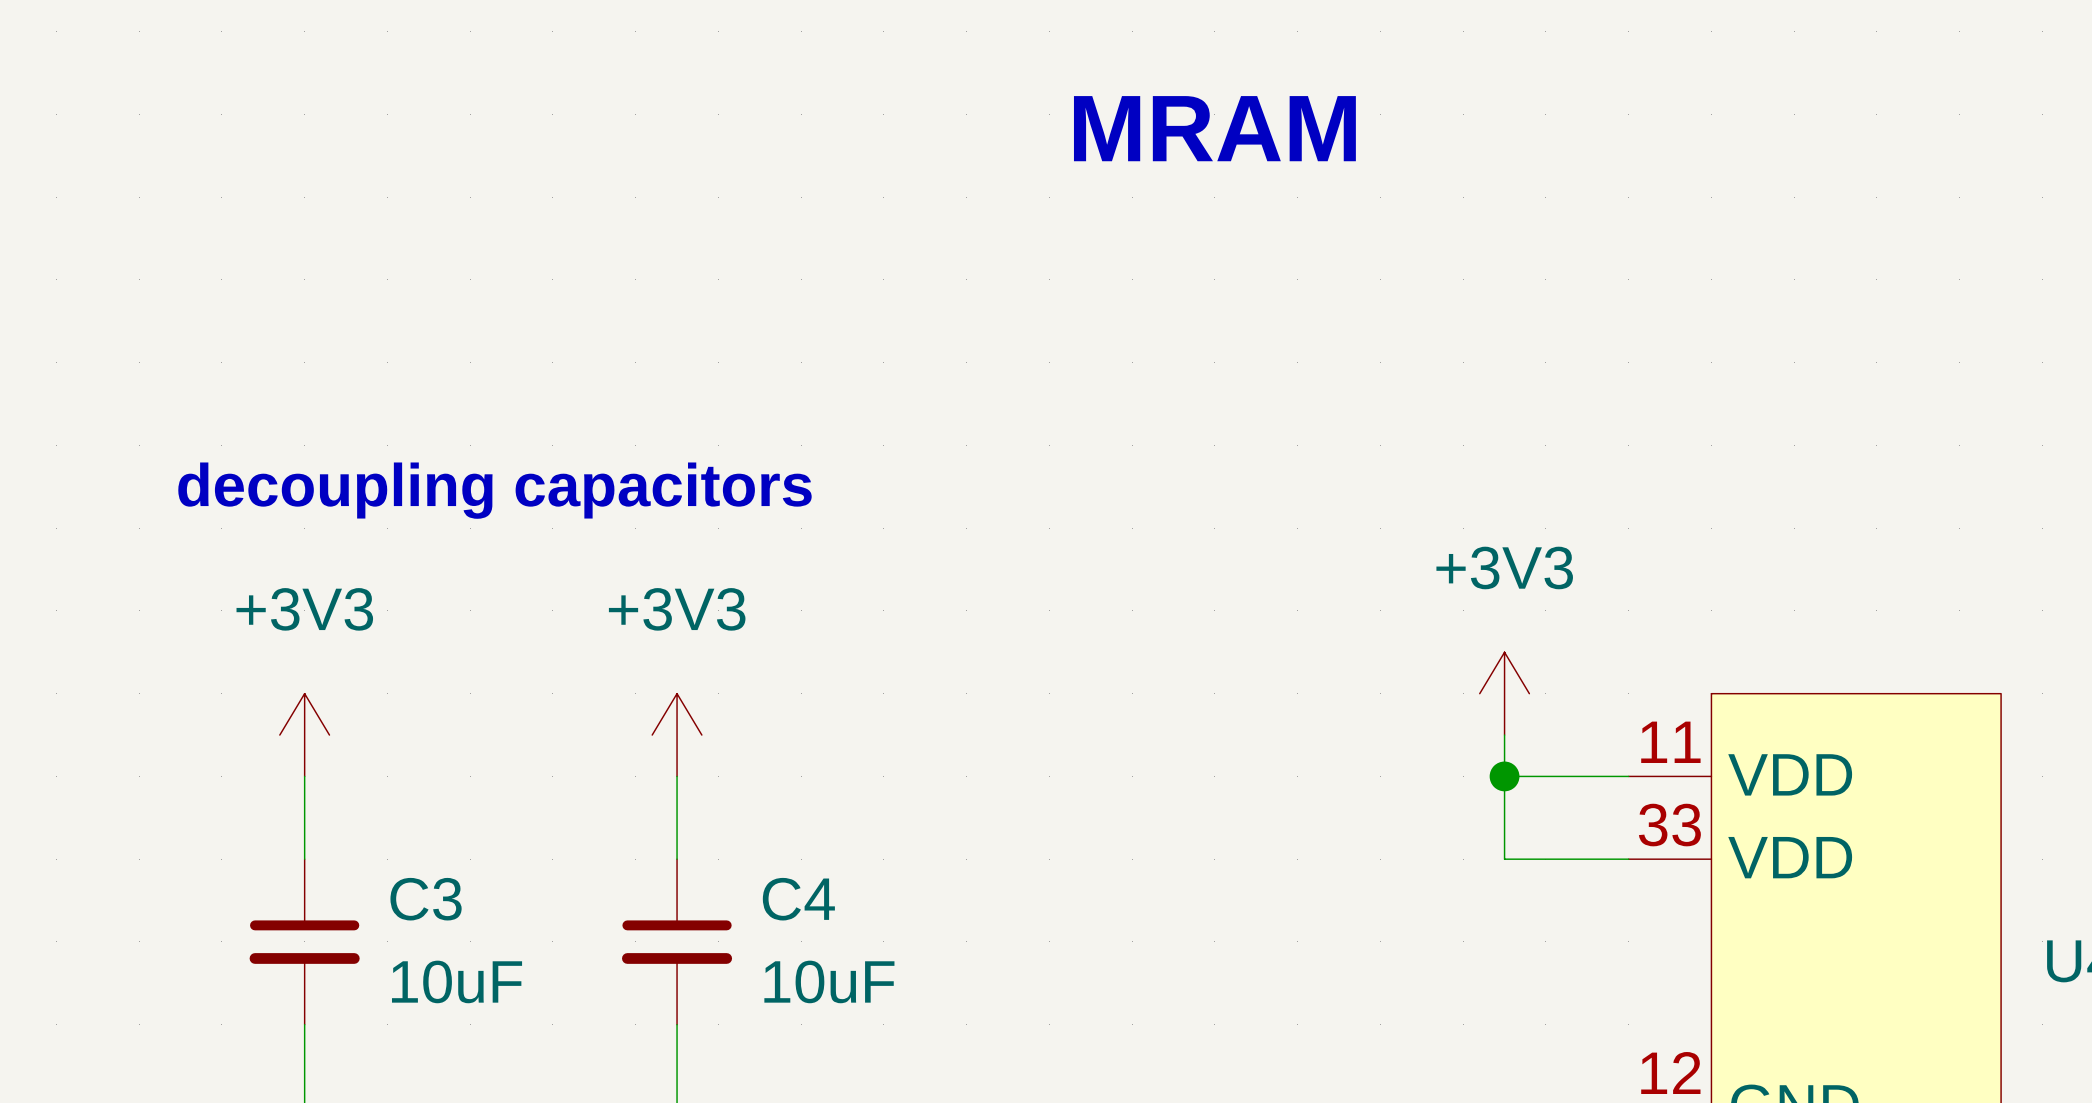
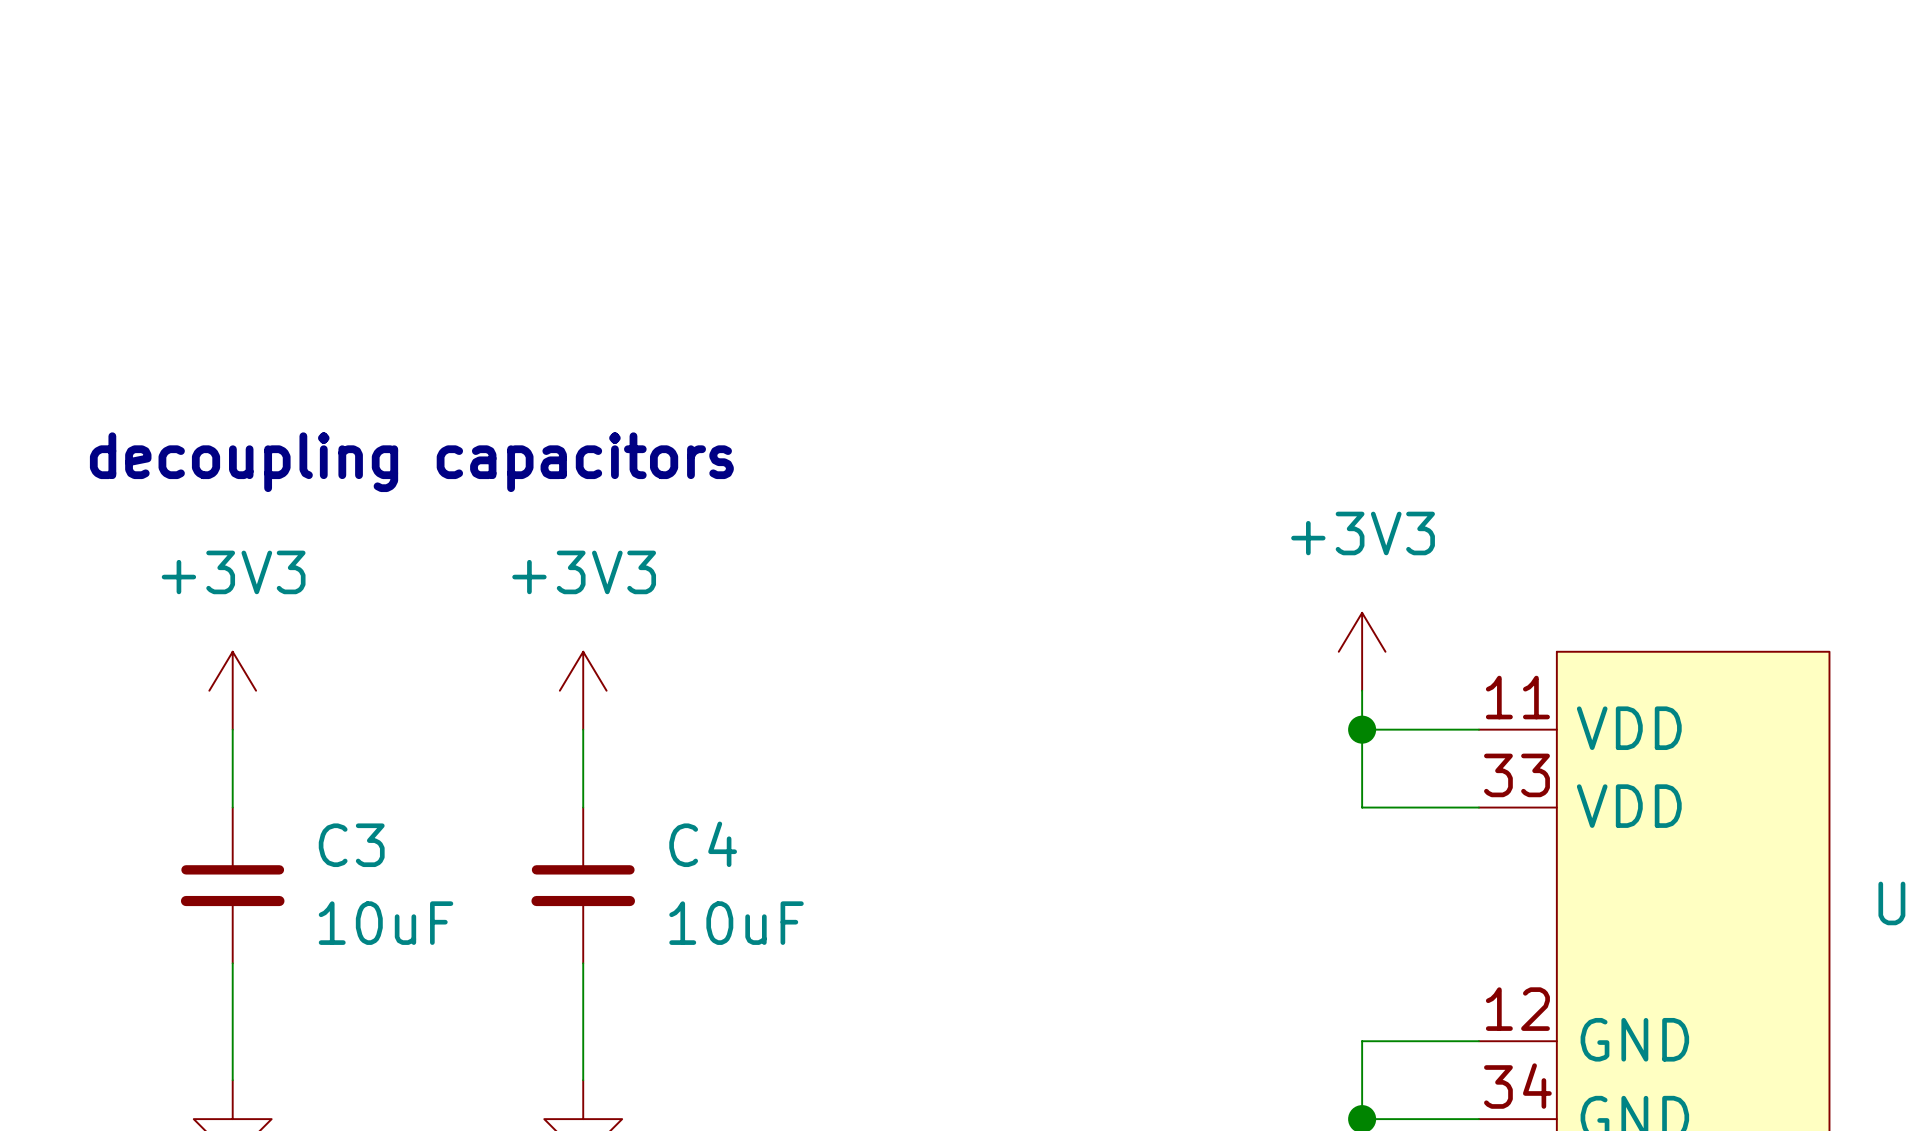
text: MRAM (1214, 128) -> none

